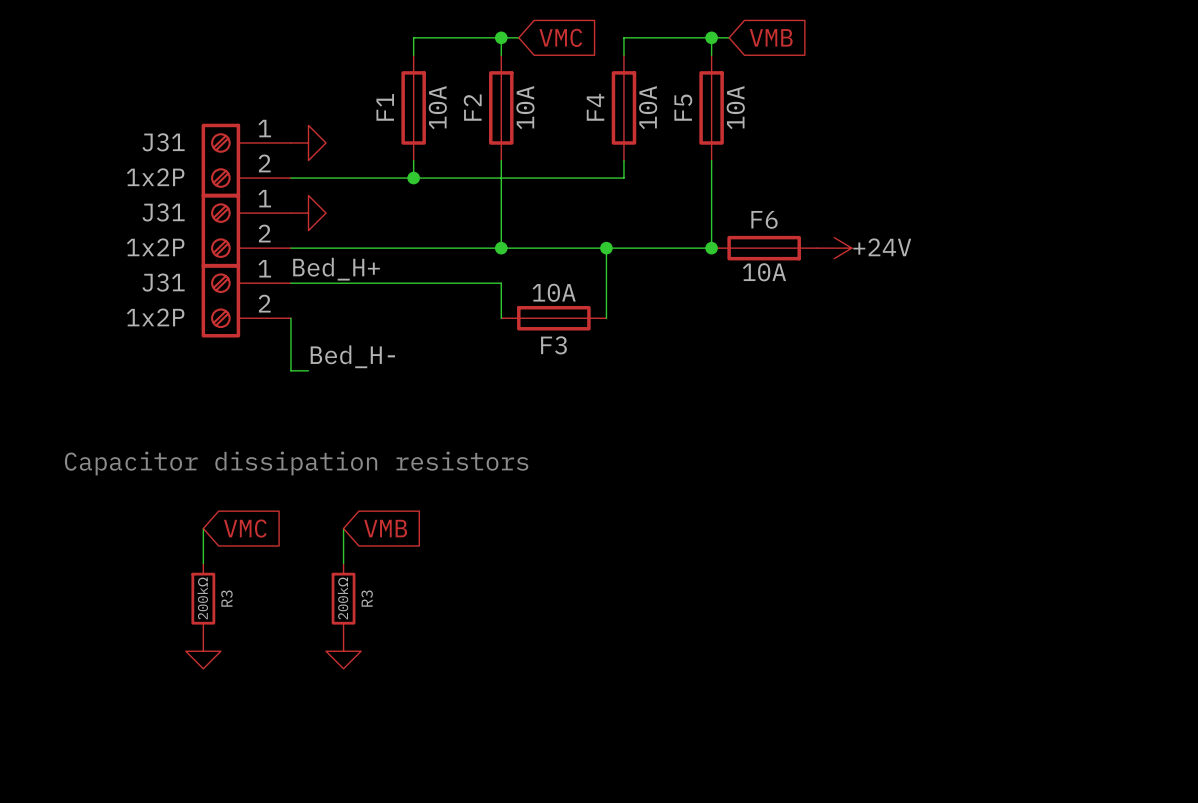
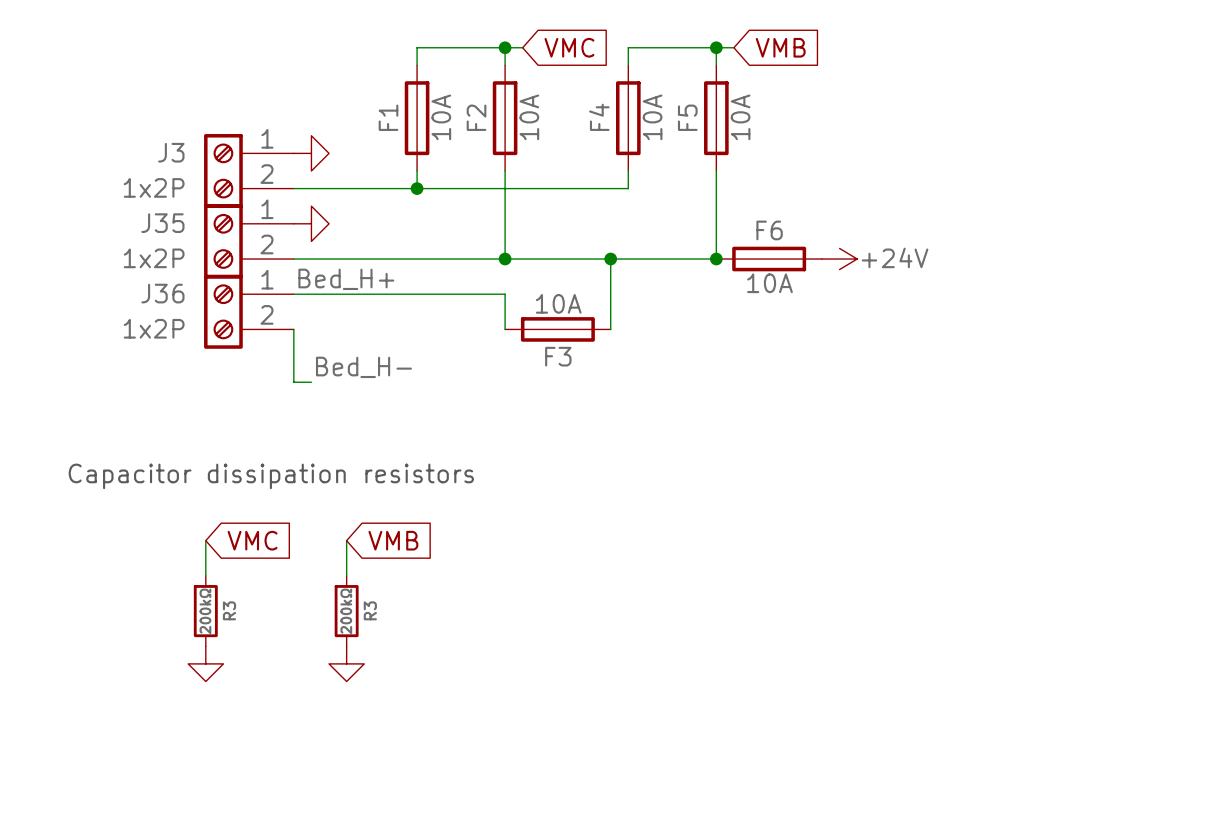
J31 name: J31 (163, 142) -> J3 (171, 152)
J31 name: J31 (163, 212) -> J35 (162, 223)
J31 name: J31 (163, 282) -> J36 (162, 293)

